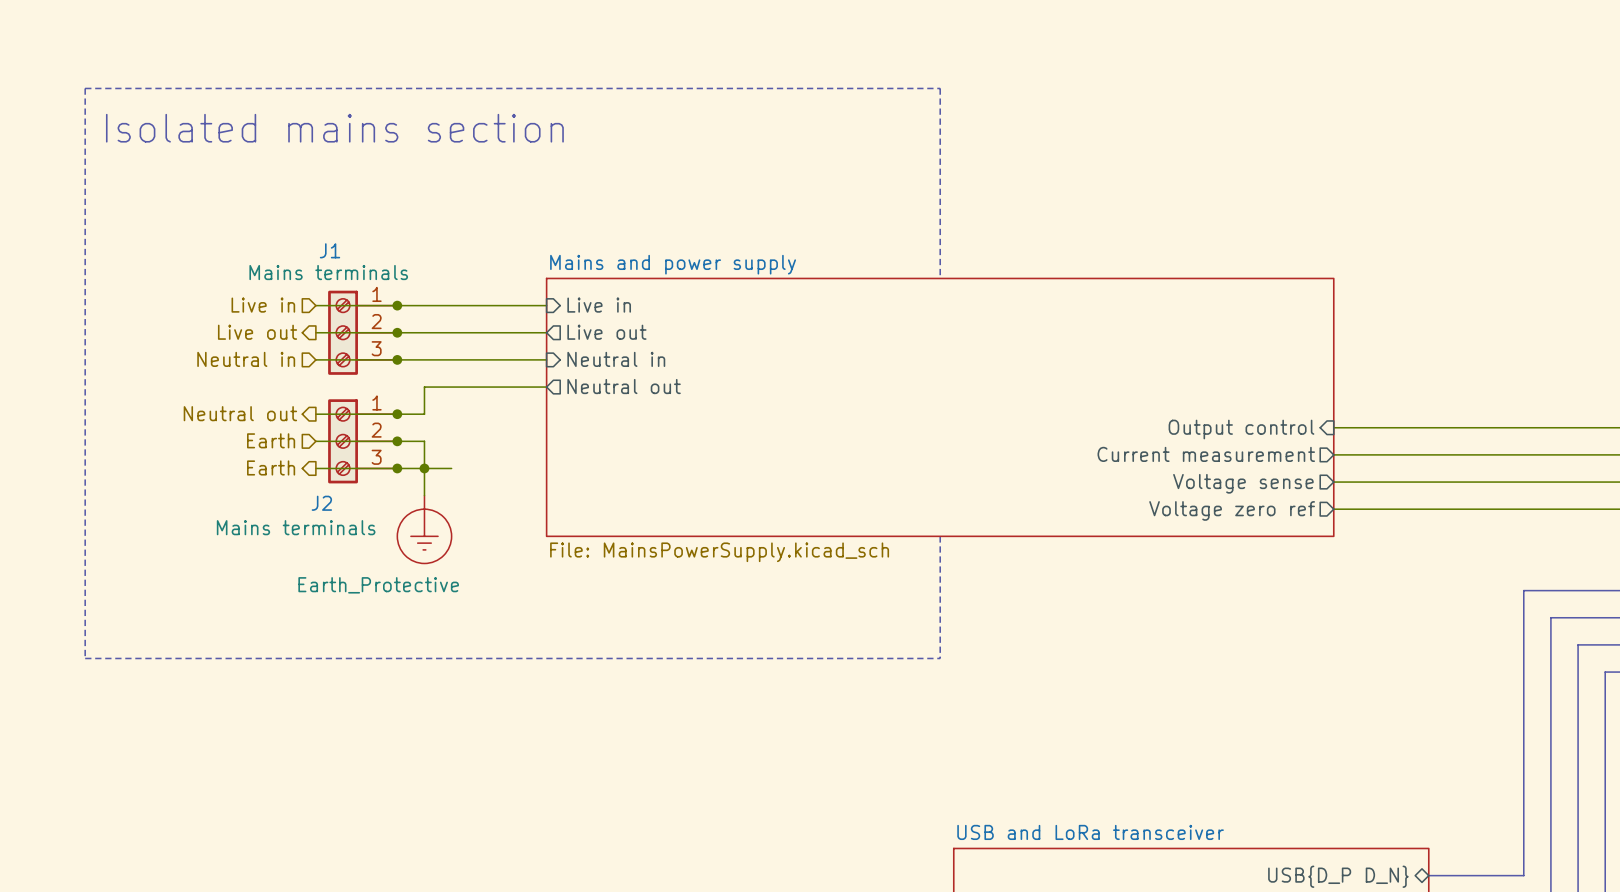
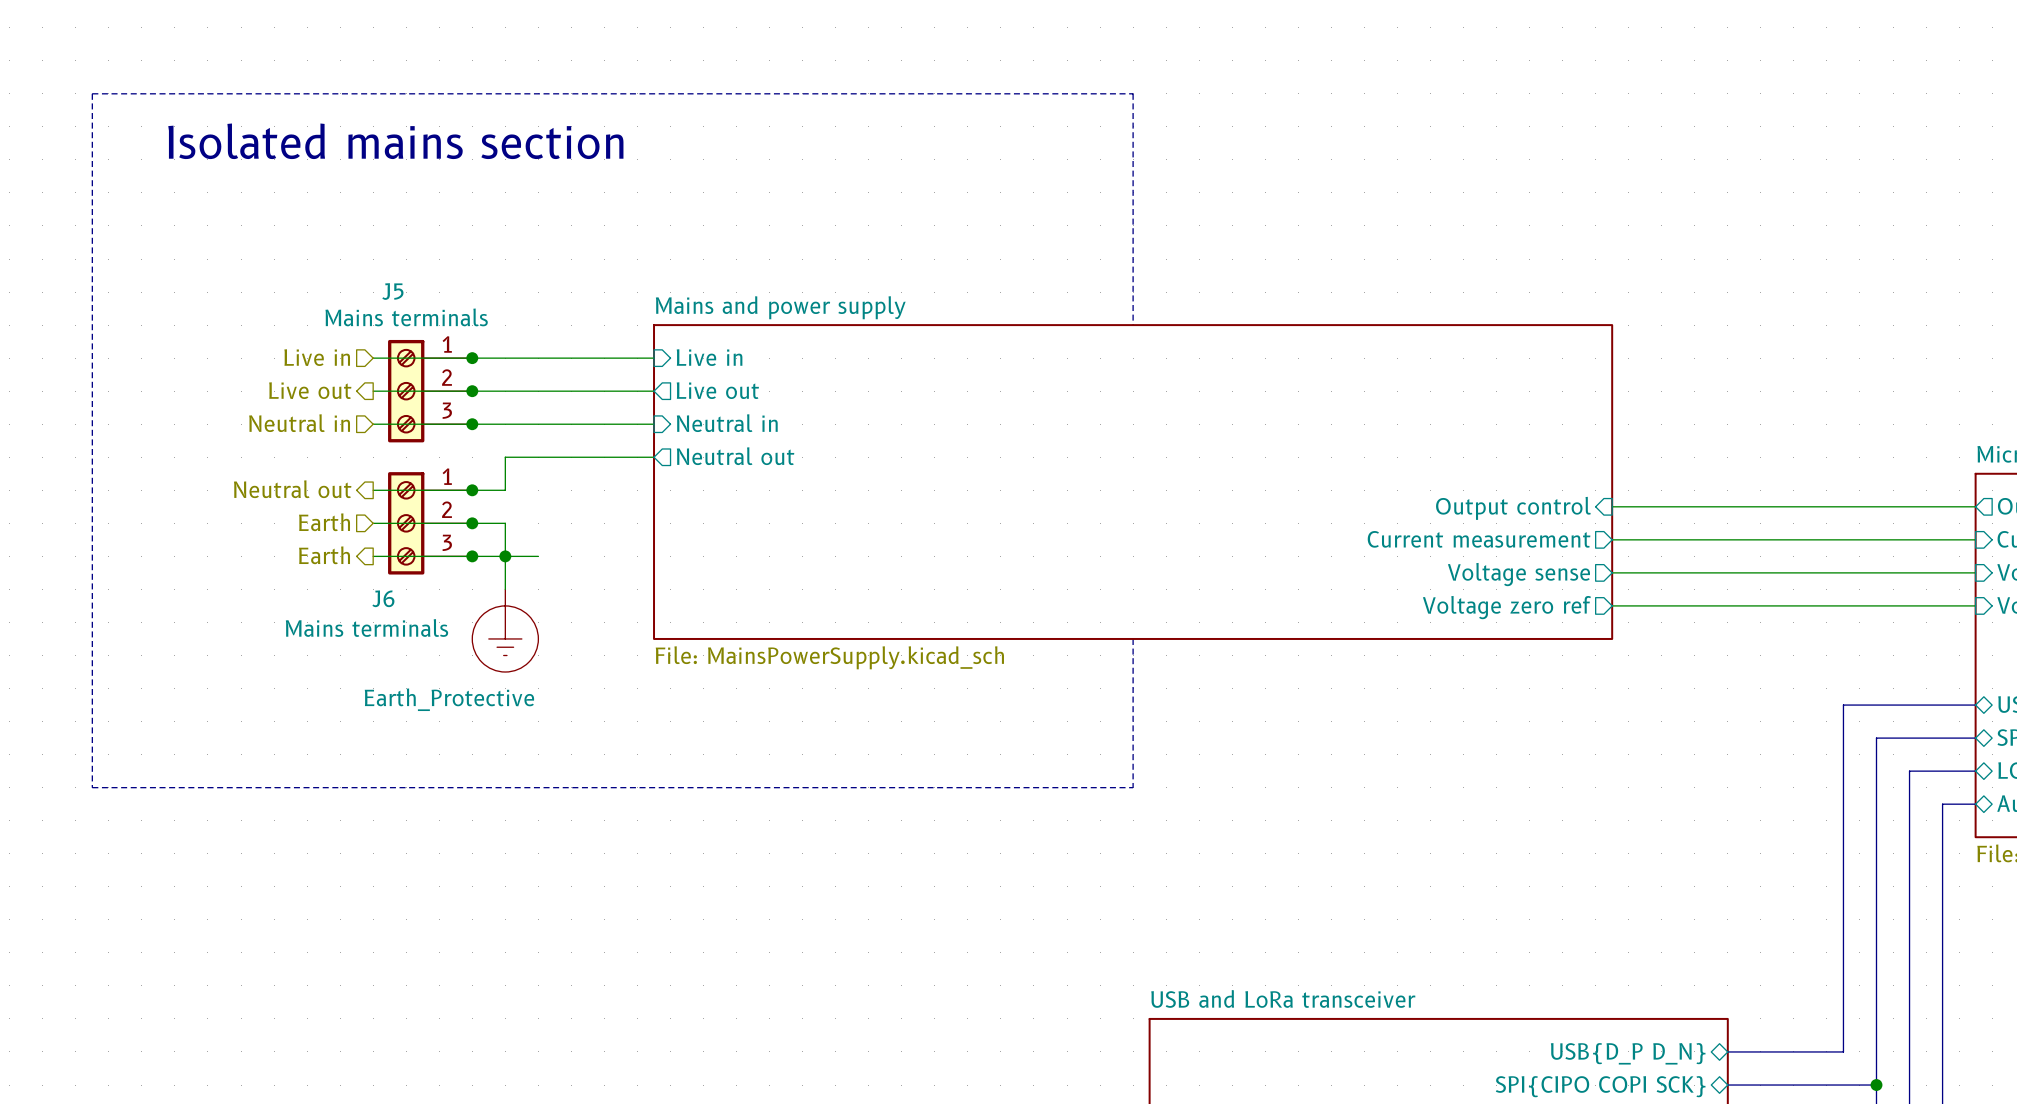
J1 name: J1 (330, 250) -> J5 (392, 291)
J2 name: J2 (321, 503) -> J6 (383, 598)

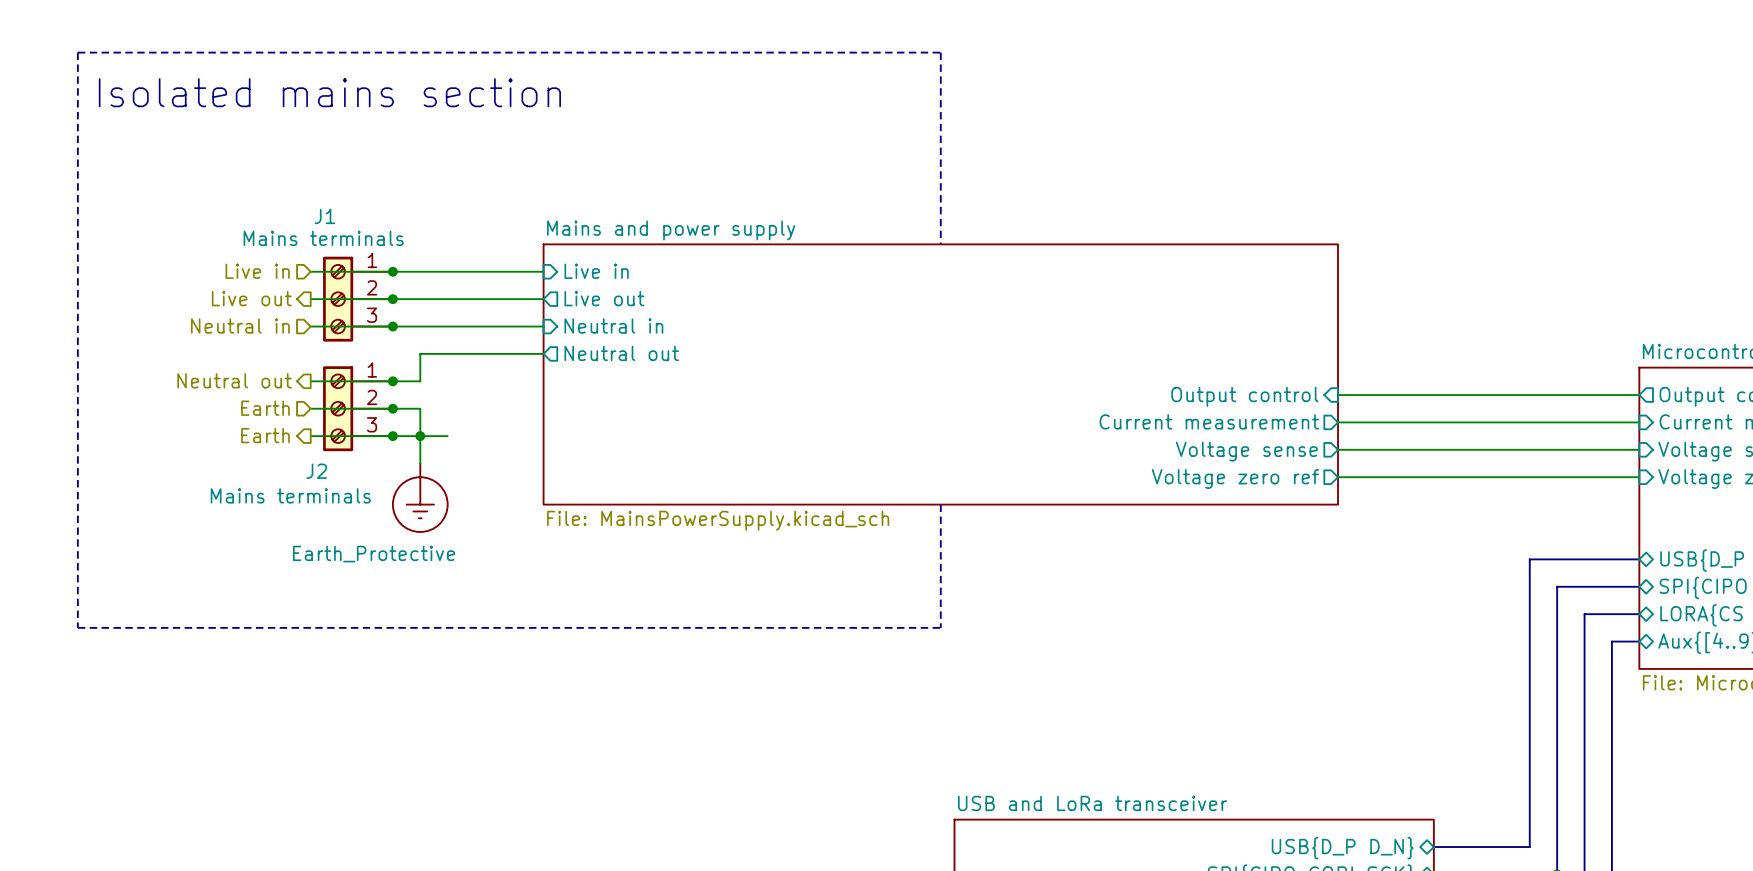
J5 name: J5 (392, 291) -> J1 (324, 216)
J6 name: J6 (383, 598) -> J2 (316, 471)

